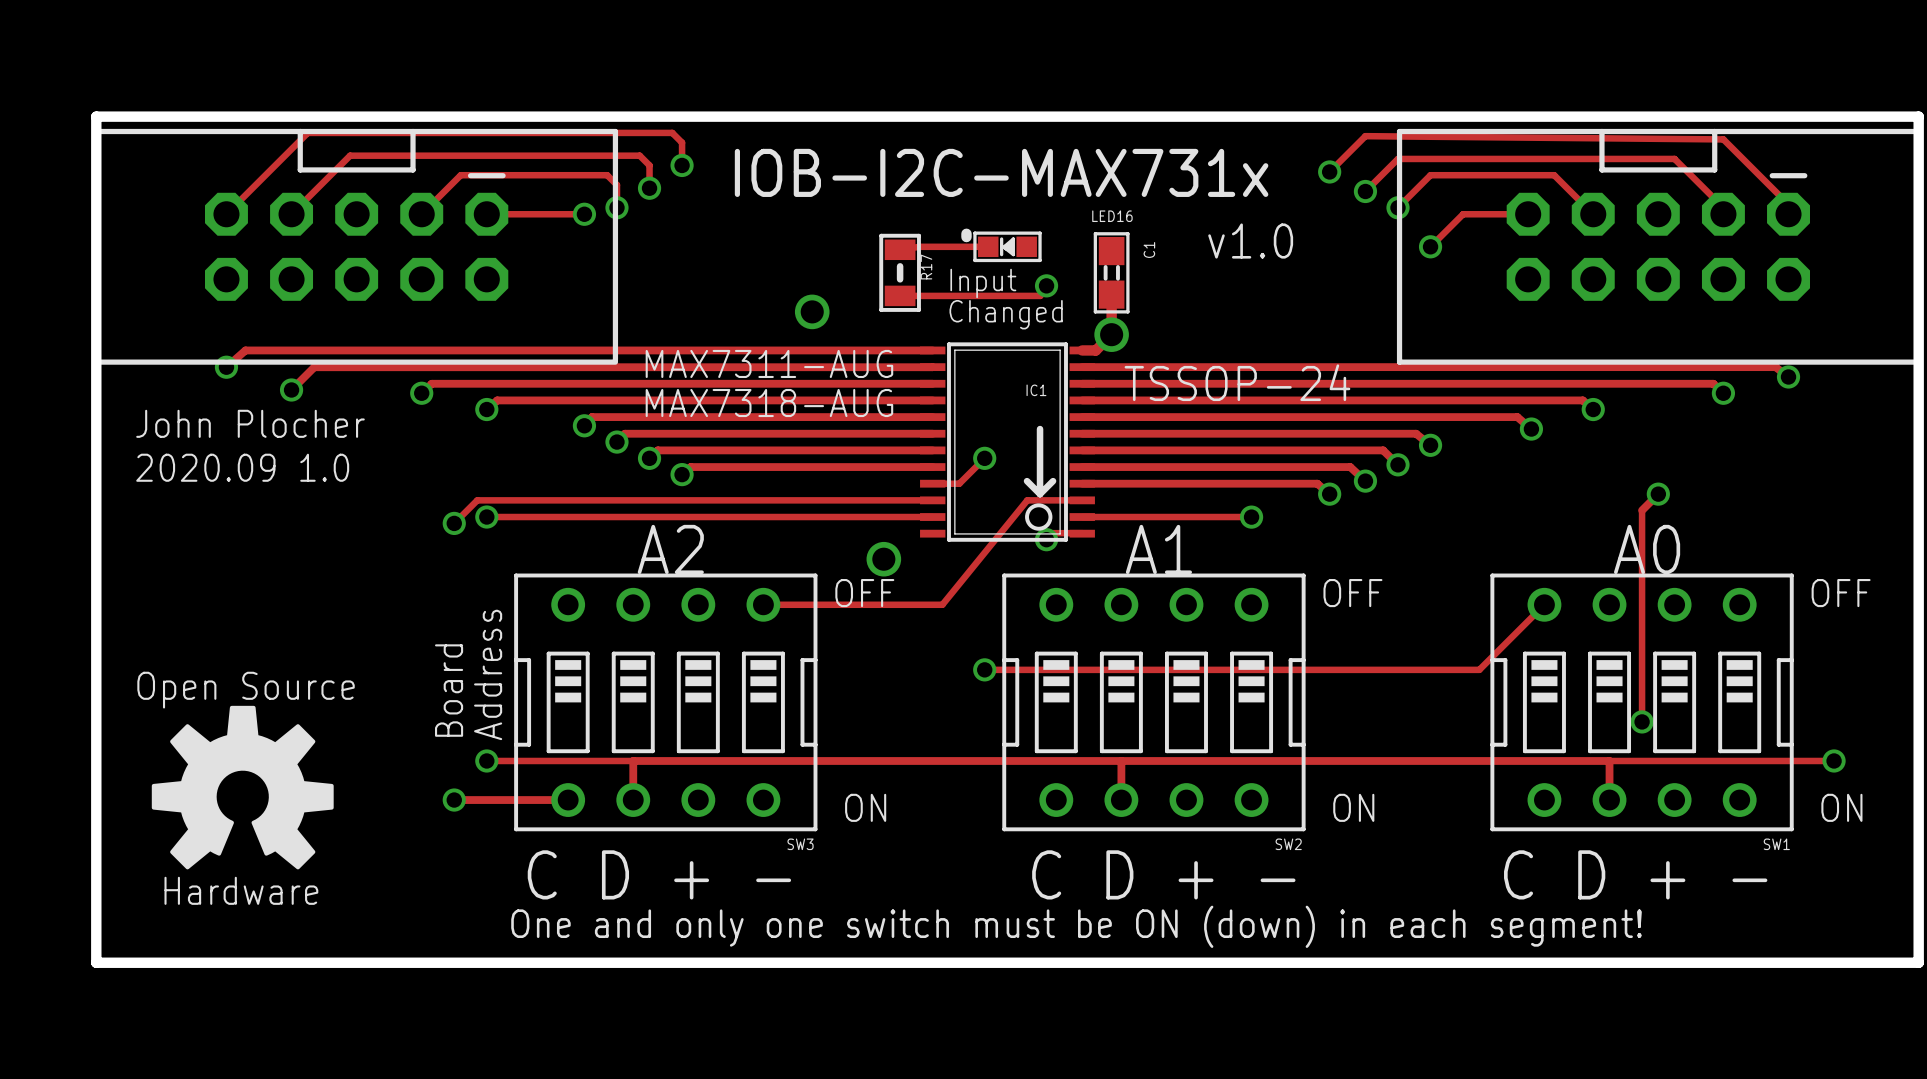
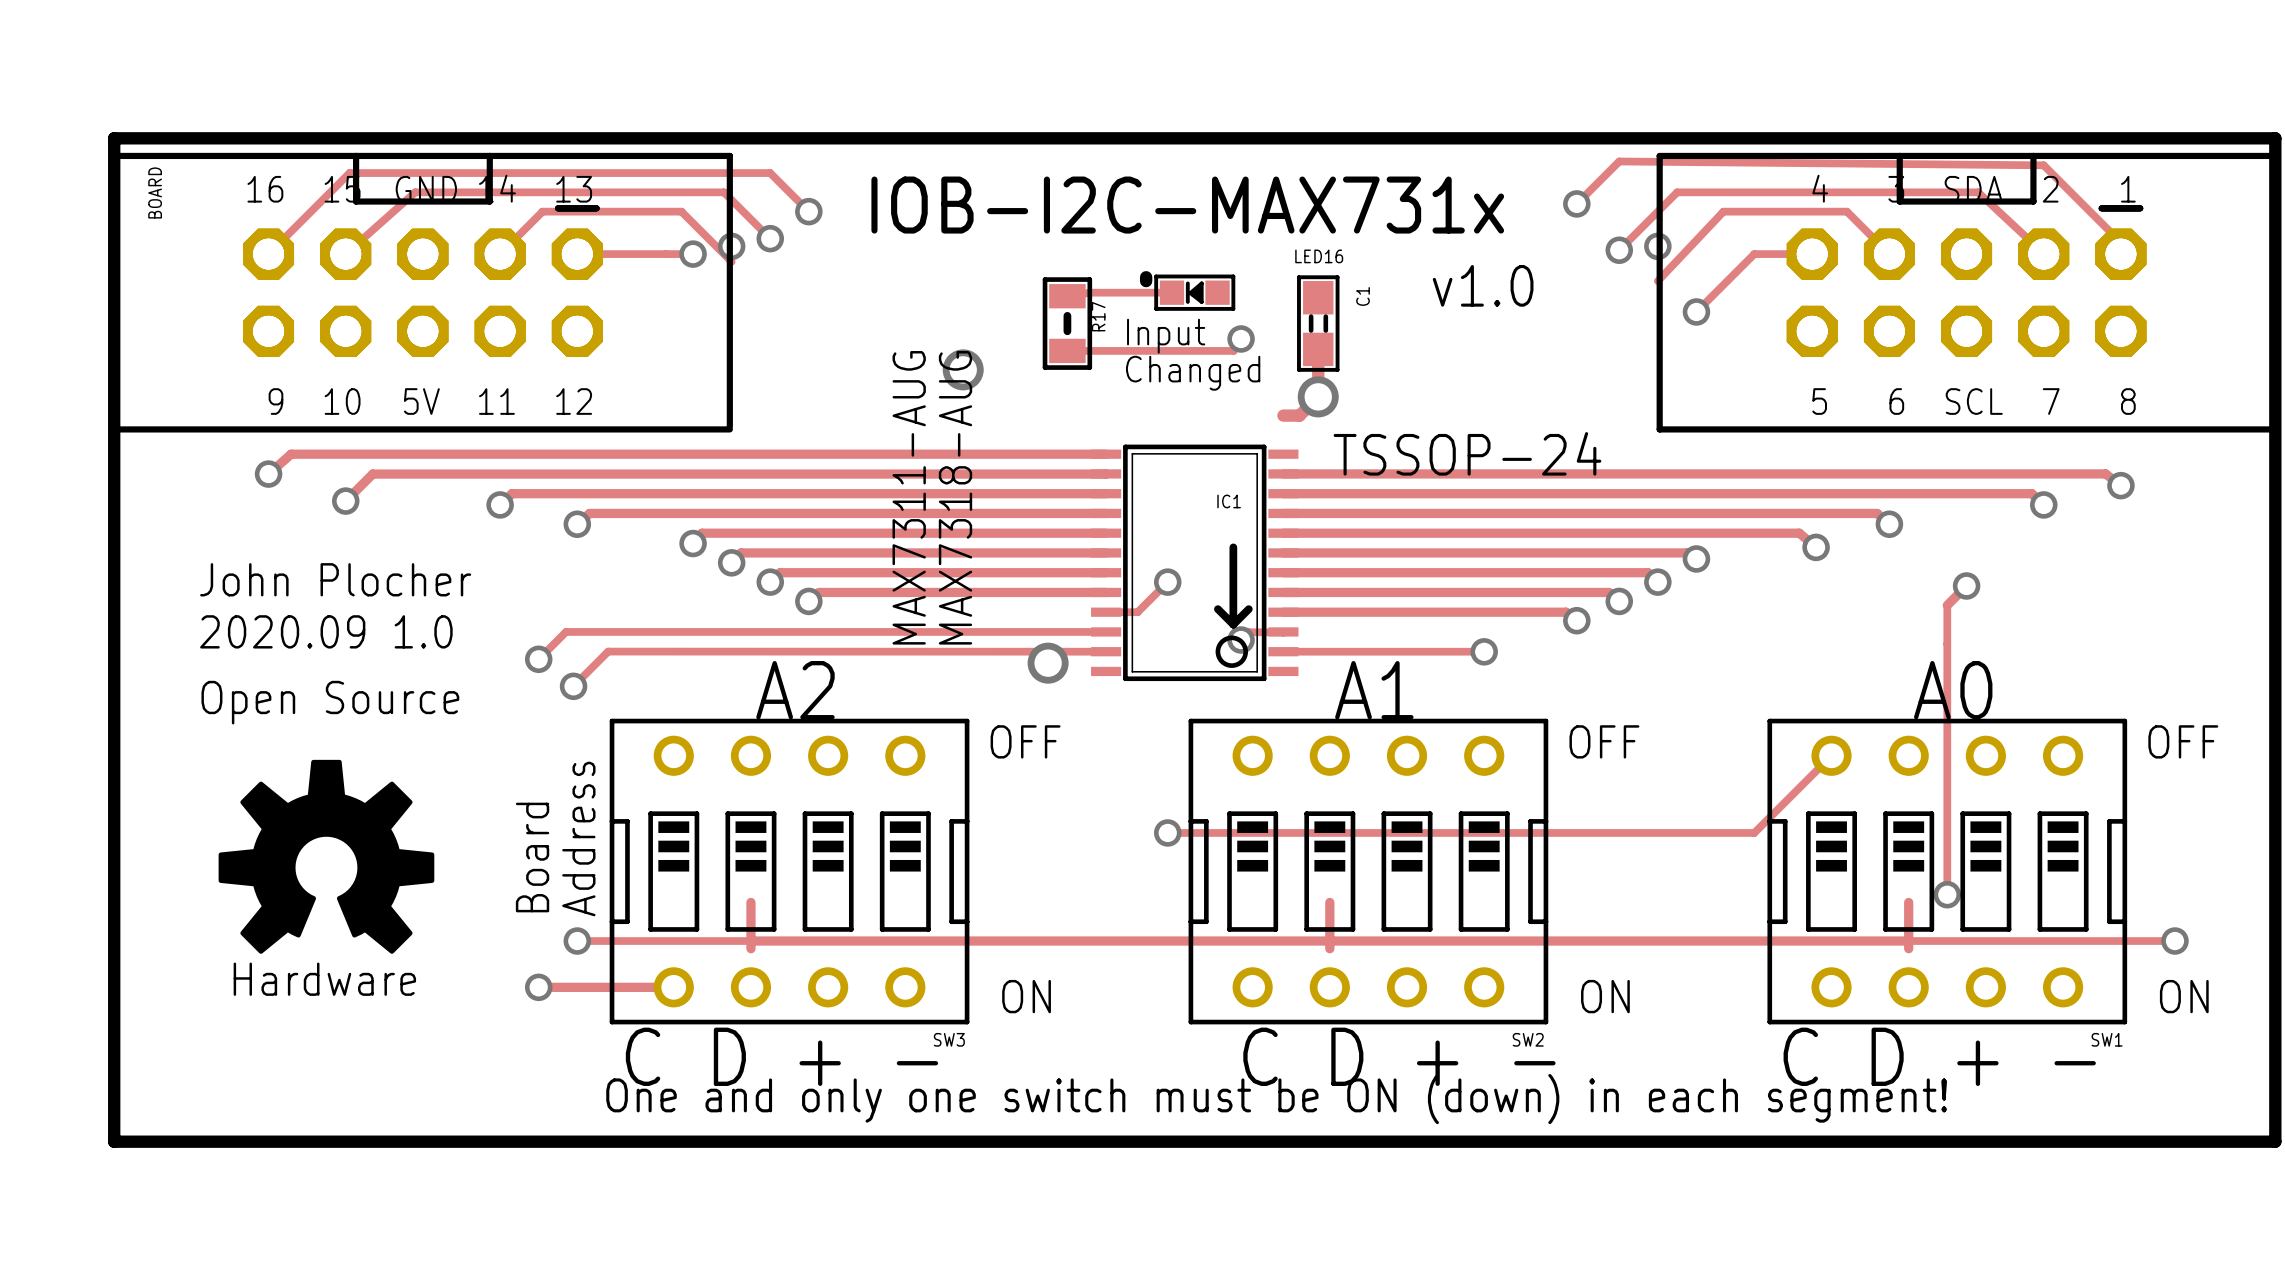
track: (294, 145) (307, 132) (672, 132) (682, 142) (682, 165) -> (349, 173) (770, 173) (808, 211)
via position: (682, 165) -> (808, 211)
track: (457, 178) (460, 175) (607, 175) (616, 184) (616, 207) -> (542, 211) (681, 211) (731, 261)
track: (1557, 178) (1554, 175) (1430, 175) (1398, 207) -> (1846, 211) (1723, 211) (1657, 281)
track: (649, 188) (649, 165) (639, 155) (350, 155) (291, 214) -> (770, 238) (723, 192) (415, 192) (345, 254)
via position: (649, 188) -> (770, 238)
track: (1365, 191) (1398, 158) (1674, 158) (1723, 207) (1723, 214) -> (1619, 250) (1677, 192) (1978, 192) (2043, 254)
via position: (1365, 191) -> (1619, 250)
track: (1479, 214) (1463, 214) (1430, 246) -> (1754, 254) (1696, 311)
BOARD: none -> (1194, 281)
via position: (1430, 246) -> (1696, 311)
track: (932, 350) (245, 350) (226, 367) -> none
text rotation: 0° (769, 363) -> 90° counterclockwise (909, 497)
via position: (226, 367) -> (268, 474)
track: (932, 367) (314, 367) (291, 389) -> none
track: (1082, 367) (1775, 367) (1788, 376) -> none
via position: (1788, 376) -> (2120, 485)
track: (932, 383) (431, 383) (421, 393) -> (1106, 454) (291, 454) (268, 474)
track: (1082, 383) (1713, 383) (1723, 393) -> none
via position: (291, 389) -> (345, 501)
via position: (421, 393) -> (500, 504)
via position: (1723, 393) -> (2043, 504)
track: (932, 400) (497, 400) (486, 409) -> (1105, 474) (372, 474) (345, 501)
track: (1082, 400) (1582, 400) (1593, 409) -> (1283, 473) (2105, 473) (2120, 485)
text rotation: 0° (769, 403) -> 90° counterclockwise (955, 497)
via position: (486, 409) -> (577, 524)
via: (1593, 409) -> none
track: (932, 417) (592, 417) (584, 425) -> (1106, 493) (512, 493) (500, 504)
track: (1082, 417) (1517, 417) (1531, 429) -> (1283, 493) (2031, 493) (2043, 504)
text position: John Plocher (250, 423) -> John Plocher (335, 579)
via: (584, 425) -> none
line: (1040, 429) (1040, 461) -> (1233, 585) (1233, 624)
via: (1531, 429) -> none
track: (932, 433) (624, 433) (616, 442) -> (1106, 513) (589, 513) (577, 524)
track: (1082, 433) (1416, 433) (1430, 445) -> (1283, 513) (1877, 513) (1889, 524)
via: (616, 442) -> none
IC1 position: (1007, 442) -> (1194, 562)
via: none -> (1889, 524)
via: (1430, 445) -> none
track: (932, 450) (657, 450) (649, 458) -> (1106, 533) (702, 533) (693, 543)
track: (1082, 450) (1383, 450) (1398, 464) -> (1283, 533) (1799, 533) (1816, 547)
via: none -> (693, 543)
via: (649, 458) -> none
track: (984, 458) (959, 483) (932, 483) -> (770, 582) (780, 572) (1106, 572)
via position: (984, 458) -> (1167, 582)
via: none -> (1816, 547)
via: (1398, 464) -> none
text position: 2020.09 1.0 (242, 467) -> 2020.09 1.0 (326, 631)
track: (932, 467) (690, 467) (682, 474) -> (1106, 552) (741, 552) (731, 562)
track: (1082, 467) (1350, 467) (1365, 481) -> (1283, 552) (1687, 552) (1696, 558)
via: none -> (1696, 558)
via: none -> (731, 562)
via: (682, 474) -> none
line: (1027, 481) (1040, 494) (1053, 481) -> none
via: (1365, 481) -> none
track: (1082, 483) (1317, 483) (1329, 494) -> (1283, 572) (1647, 572) (1657, 582)
via: none -> (770, 582)
via: none -> (1657, 582)
via: (1329, 494) -> none
track: (932, 500) (477, 500) (454, 523) -> (1106, 592) (819, 592) (808, 601)
track: (1082, 500) (1027, 500) (942, 604) (763, 604) -> (1283, 592) (1608, 592) (1619, 601)
via: none -> (808, 601)
via: none -> (1619, 601)
line: none -> (1217, 609) (1233, 624)
line: none -> (1248, 609) (1233, 624)
track: (486, 517) (932, 517) -> (1167, 582) (1137, 612) (1106, 612)
via: (486, 517) -> none
track: (1082, 517) (1251, 517) -> (1283, 612) (1566, 612) (1576, 620)
via position: (1251, 517) -> (1484, 651)
via: (454, 523) -> none
via: none -> (1576, 620)
track: none -> (1106, 631) (566, 631) (538, 659)
text position: A2 (670, 549) -> A2 (795, 690)
track: none -> (1106, 651) (608, 651) (573, 686)
track: none -> (1283, 651) (1484, 651)
text position: A1 (1158, 549) -> A1 (1374, 690)
text position: A0 (1647, 549) -> A0 (1953, 690)
via: none -> (538, 659)
via: none -> (573, 686)
text position: OFF (864, 593) -> OFF (1025, 741)
text position: OFF (1352, 593) -> OFF (1604, 741)
text position: OFF (1841, 593) -> OFF (2183, 741)
track: (1544, 604) (1479, 669) (984, 669) -> (1831, 755) (1754, 832) (1167, 832)
via position: (984, 669) -> (1167, 832)
text position: Address (488, 674) -> Address (578, 838)
text position: Open Source (246, 690) -> Open Source (330, 702)
text position: Board (449, 690) -> Board (532, 857)
SW3 position: (665, 702) -> (789, 871)
SW2 position: (1153, 702) -> (1368, 871)
SW1 position: (1642, 702) -> (1947, 871)
track: none -> (1947, 856) (1947, 894)
via position: (1642, 721) -> (1947, 894)
track: (486, 760) (1834, 760) -> (577, 941) (2174, 941)
via: (486, 760) -> none
via position: (1834, 760) -> (2174, 941)
drawing position: (242, 787) -> (326, 856)
via: none -> (577, 941)
track: (454, 800) (568, 800) -> (538, 987) (673, 987)
via: (454, 800) -> none
text position: ON (865, 807) -> ON (1026, 996)
text position: ON (1353, 807) -> ON (1605, 996)
text position: ON (1841, 807) -> ON (2184, 996)
via: none -> (538, 987)
text position: C D + - (659, 874) -> C D + - (781, 1056)
text position: C D + - (1163, 874) -> C D + - (1399, 1056)
text position: C D + - (1635, 874) -> C D + - (1939, 1056)
text position: Hardware (241, 890) -> Hardware (324, 979)

